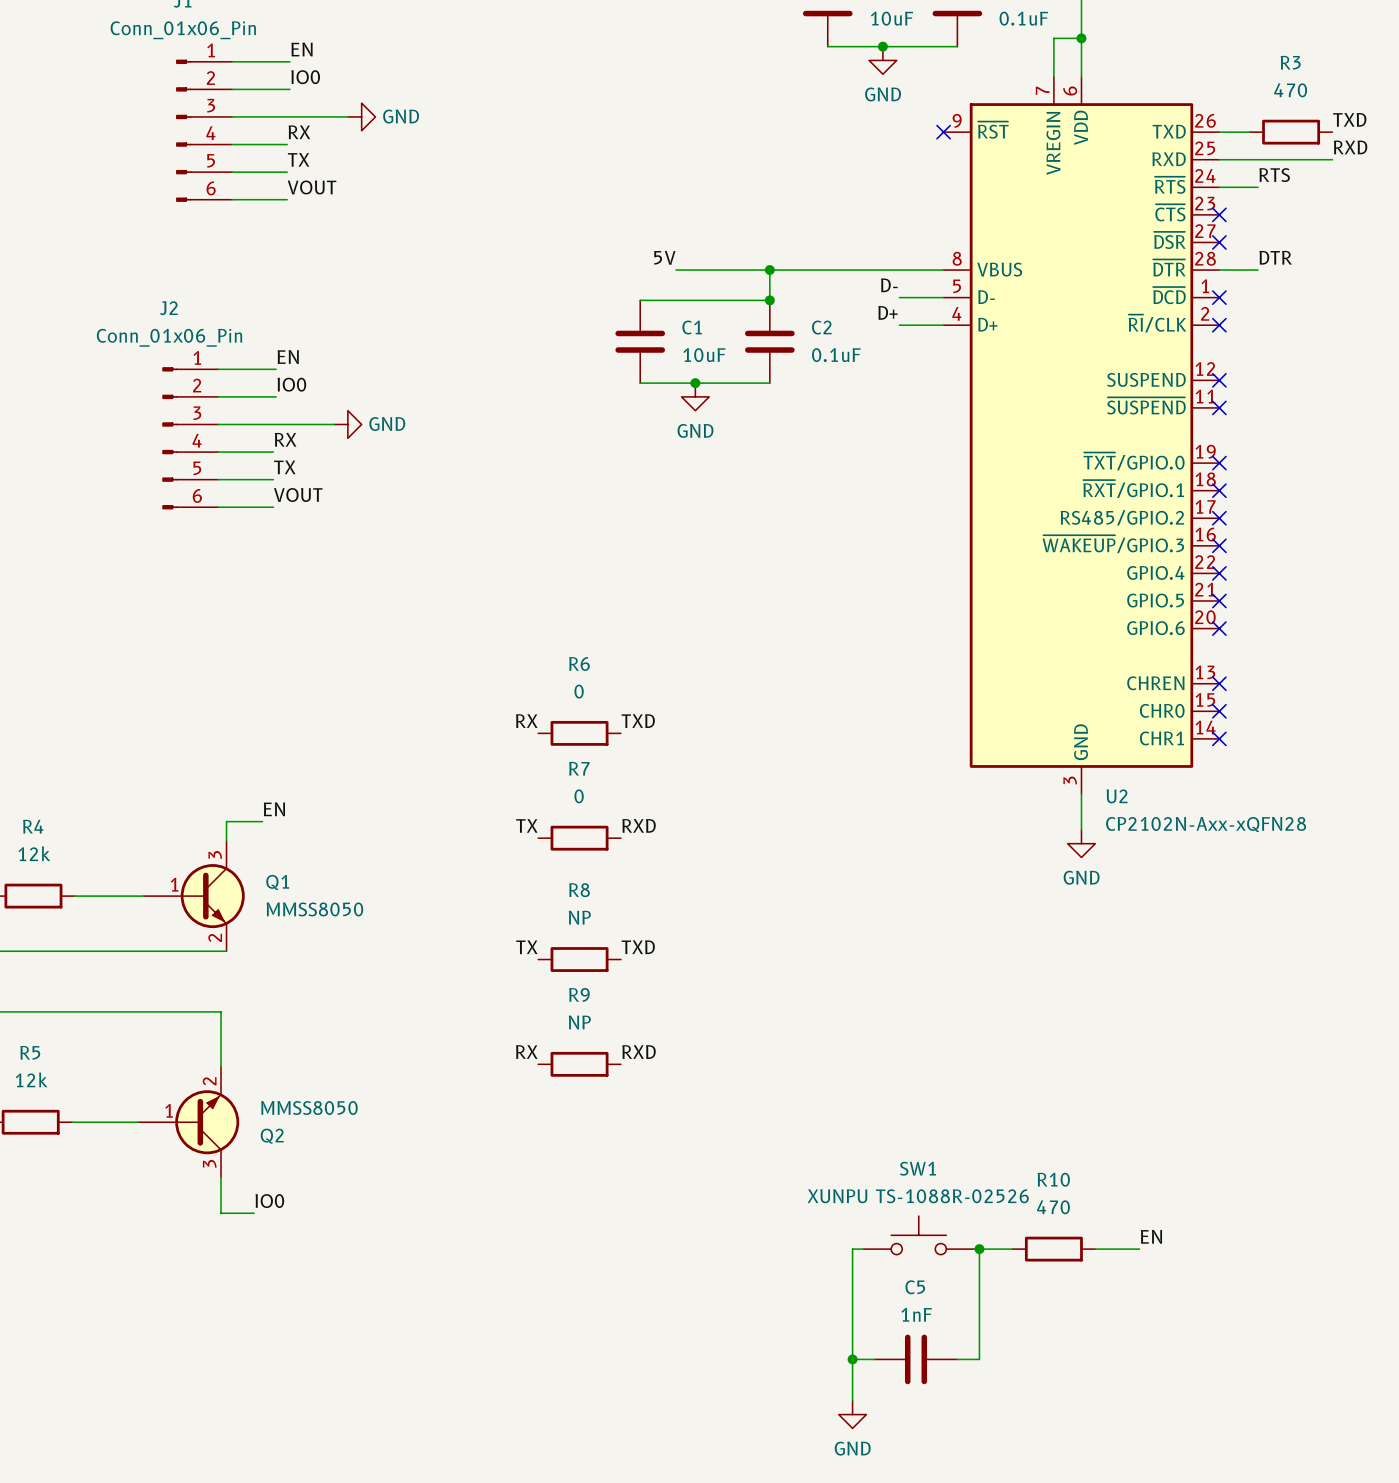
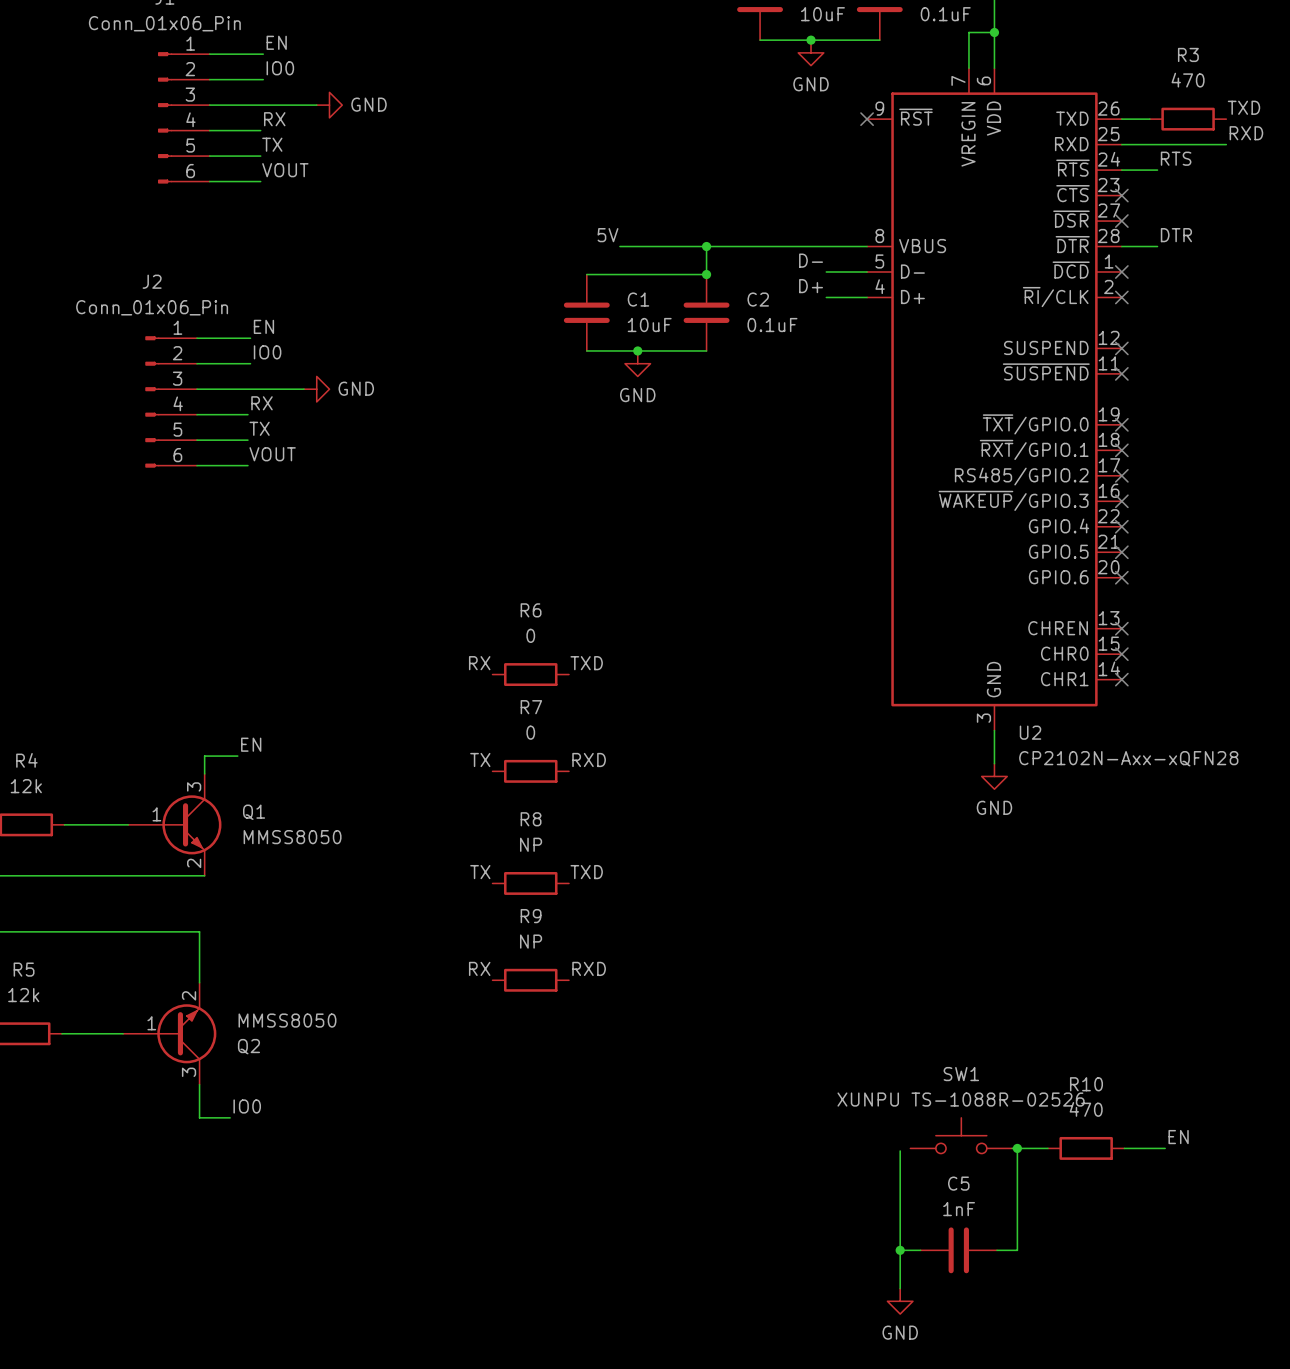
SW1 position: (918, 1235) -> (961, 1135)
label position: EN (1151, 1236) -> EN (1178, 1137)
wire: none -> (1017, 1148) (1017, 1250) (997, 1250)
junction: none -> (1017, 1148)
wire: (863, 1249) (852, 1249) (852, 1400) -> none
wire: (973, 1249) (1012, 1249) -> (1012, 1148) (1047, 1148)
junction: (979, 1249) -> none
R10 position: (1053, 1249) -> (1086, 1148)
wire: (1095, 1249) (1139, 1249) -> (1124, 1148) (1165, 1148)
junction: none -> (900, 1250)
wire: (852, 1359) (874, 1359) -> (900, 1250) (920, 1250)
junction: (852, 1359) -> none
C5 position: (916, 1359) -> (958, 1250)
wire: (957, 1359) (979, 1359) -> (900, 1288) (900, 1252)
power symbol position: GND (852, 1414) -> GND (900, 1301)

